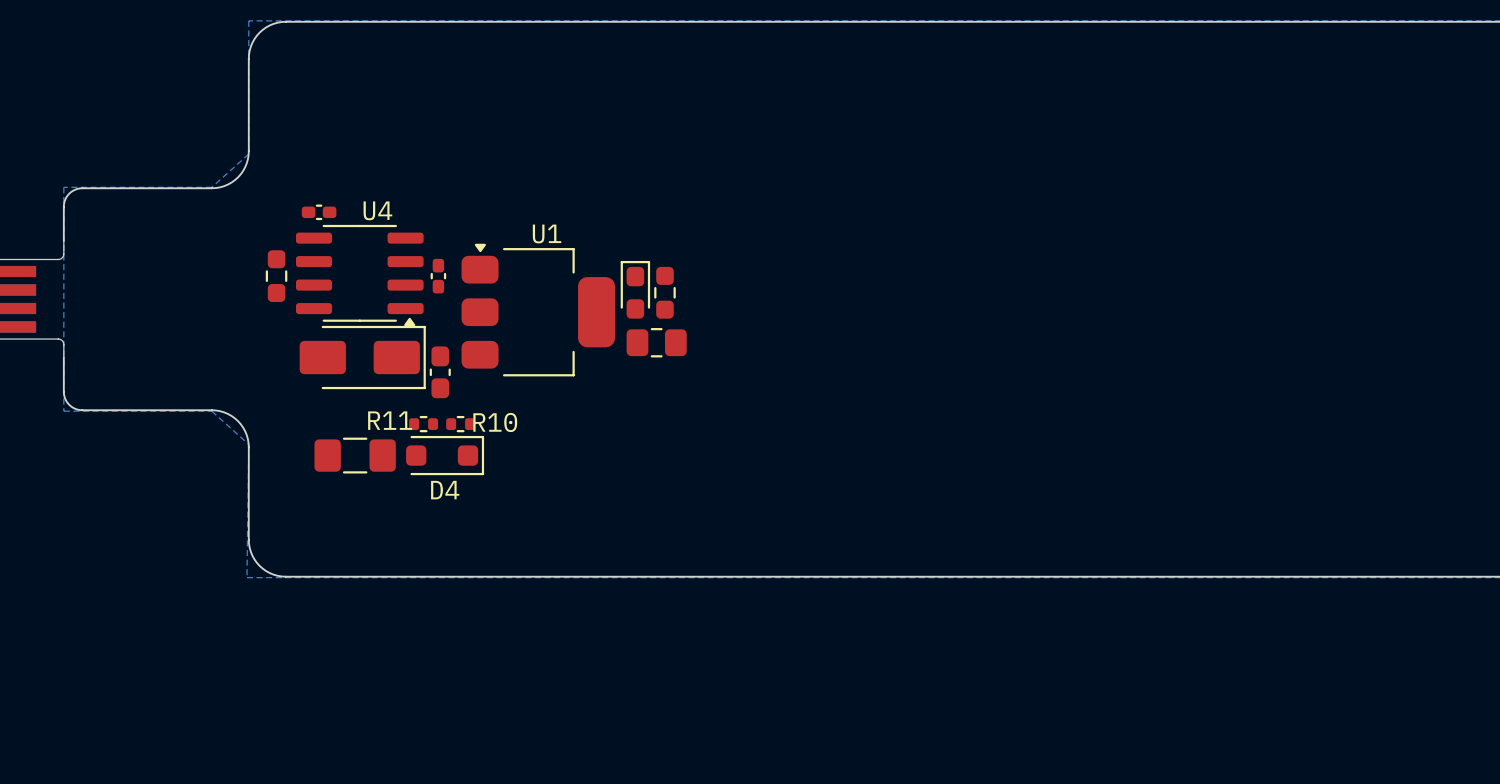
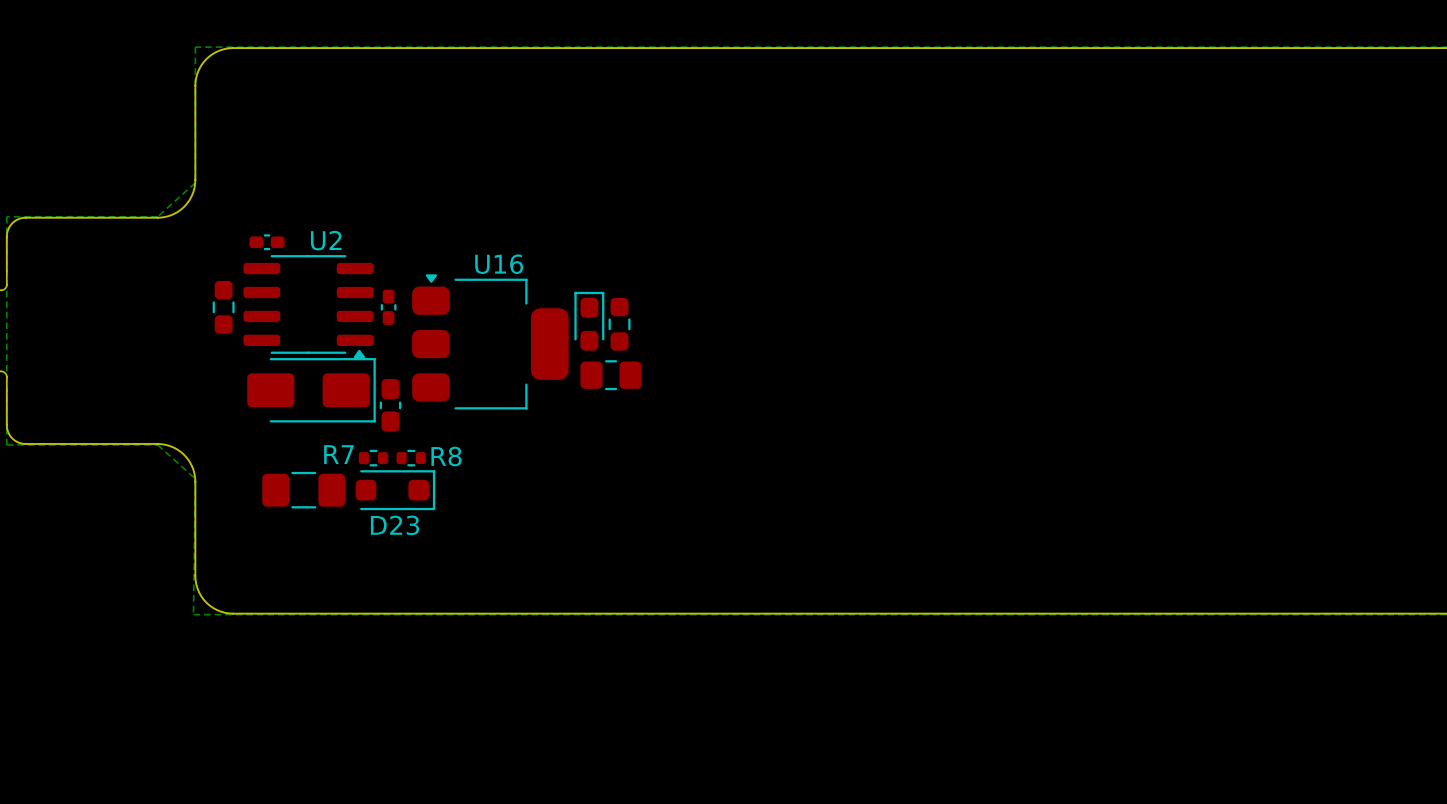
U4 name: U4 (377, 210) -> U2 (326, 240)
U1 name: U1 (547, 233) -> U16 (499, 264)
R11 name: R11 (390, 420) -> R7 (338, 454)
R10 name: R10 (495, 422) -> R8 (446, 456)
D4 name: D4 (445, 490) -> D23 (394, 525)

